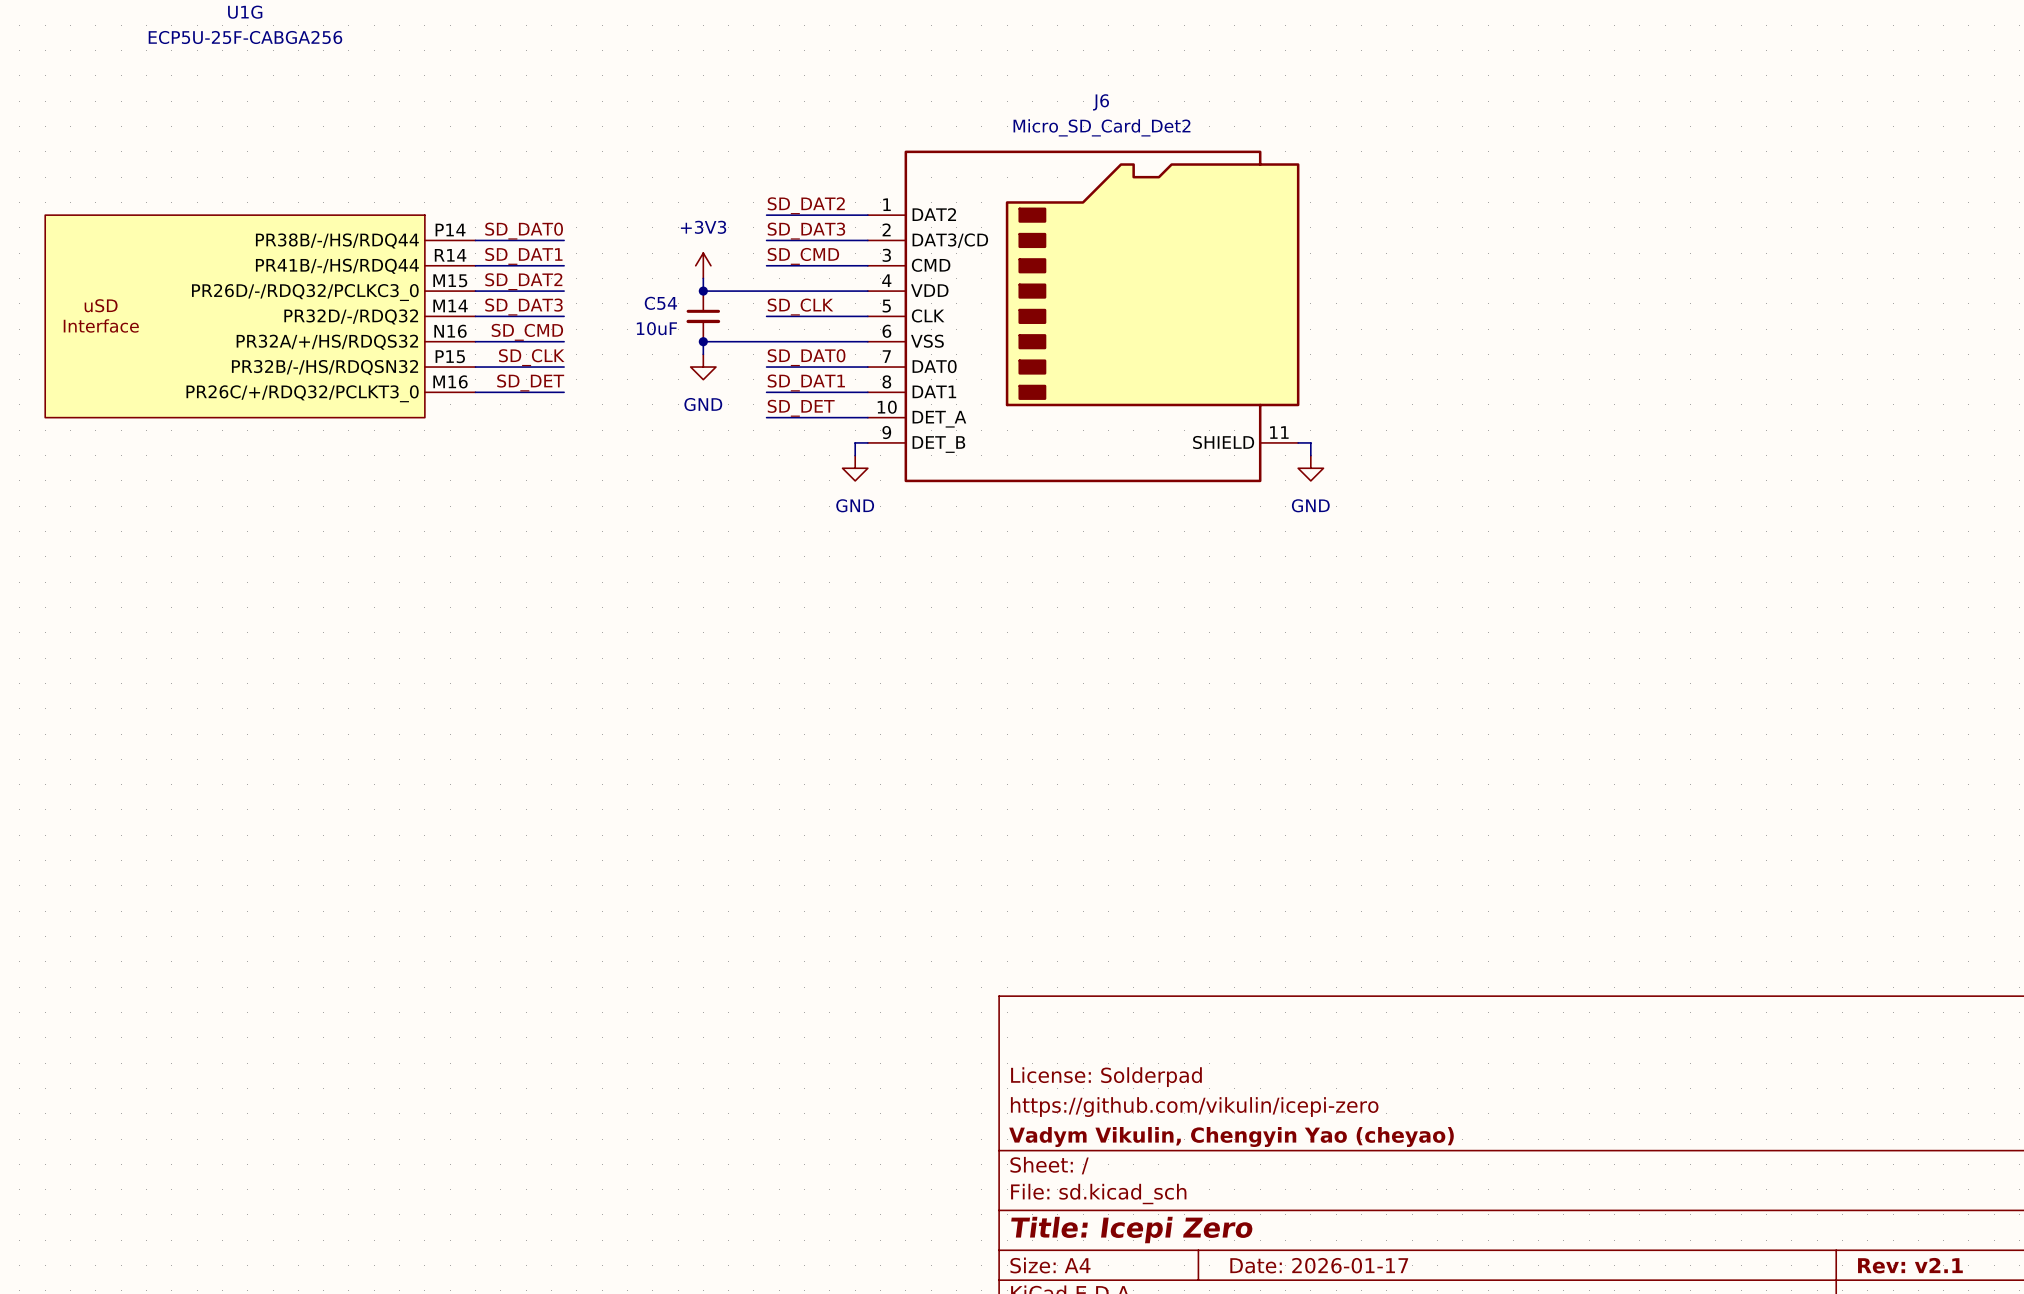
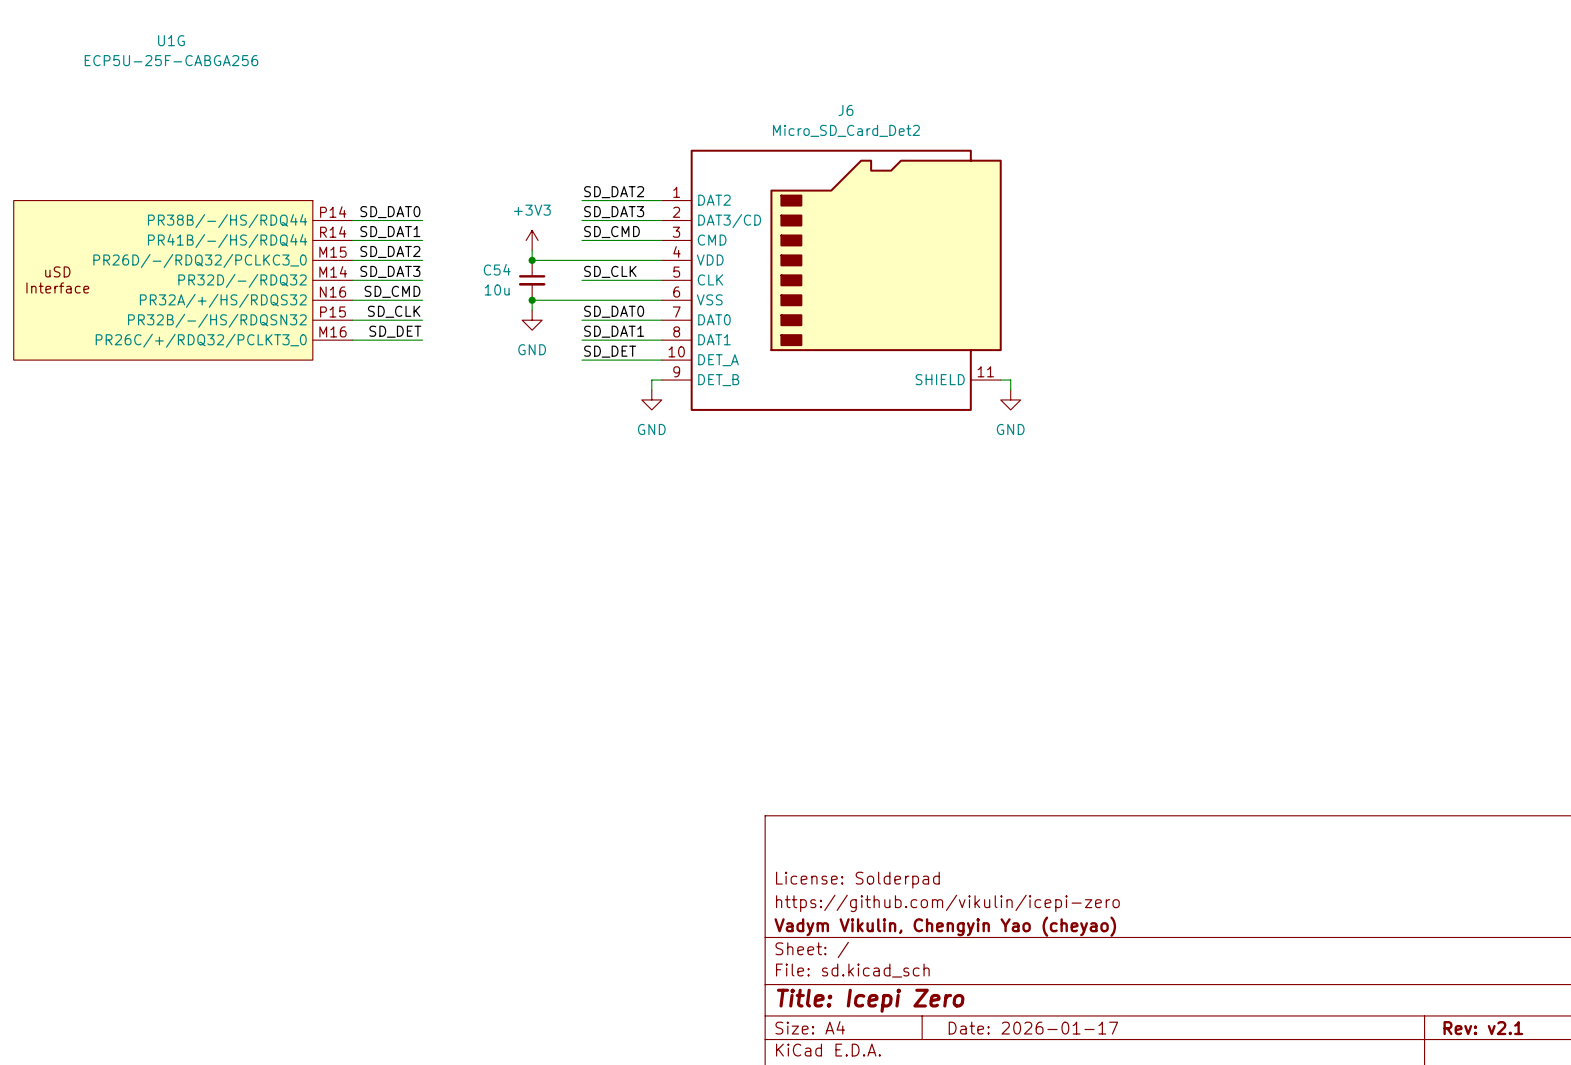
C54 value: 10uF (656, 328) -> 10u (497, 289)

